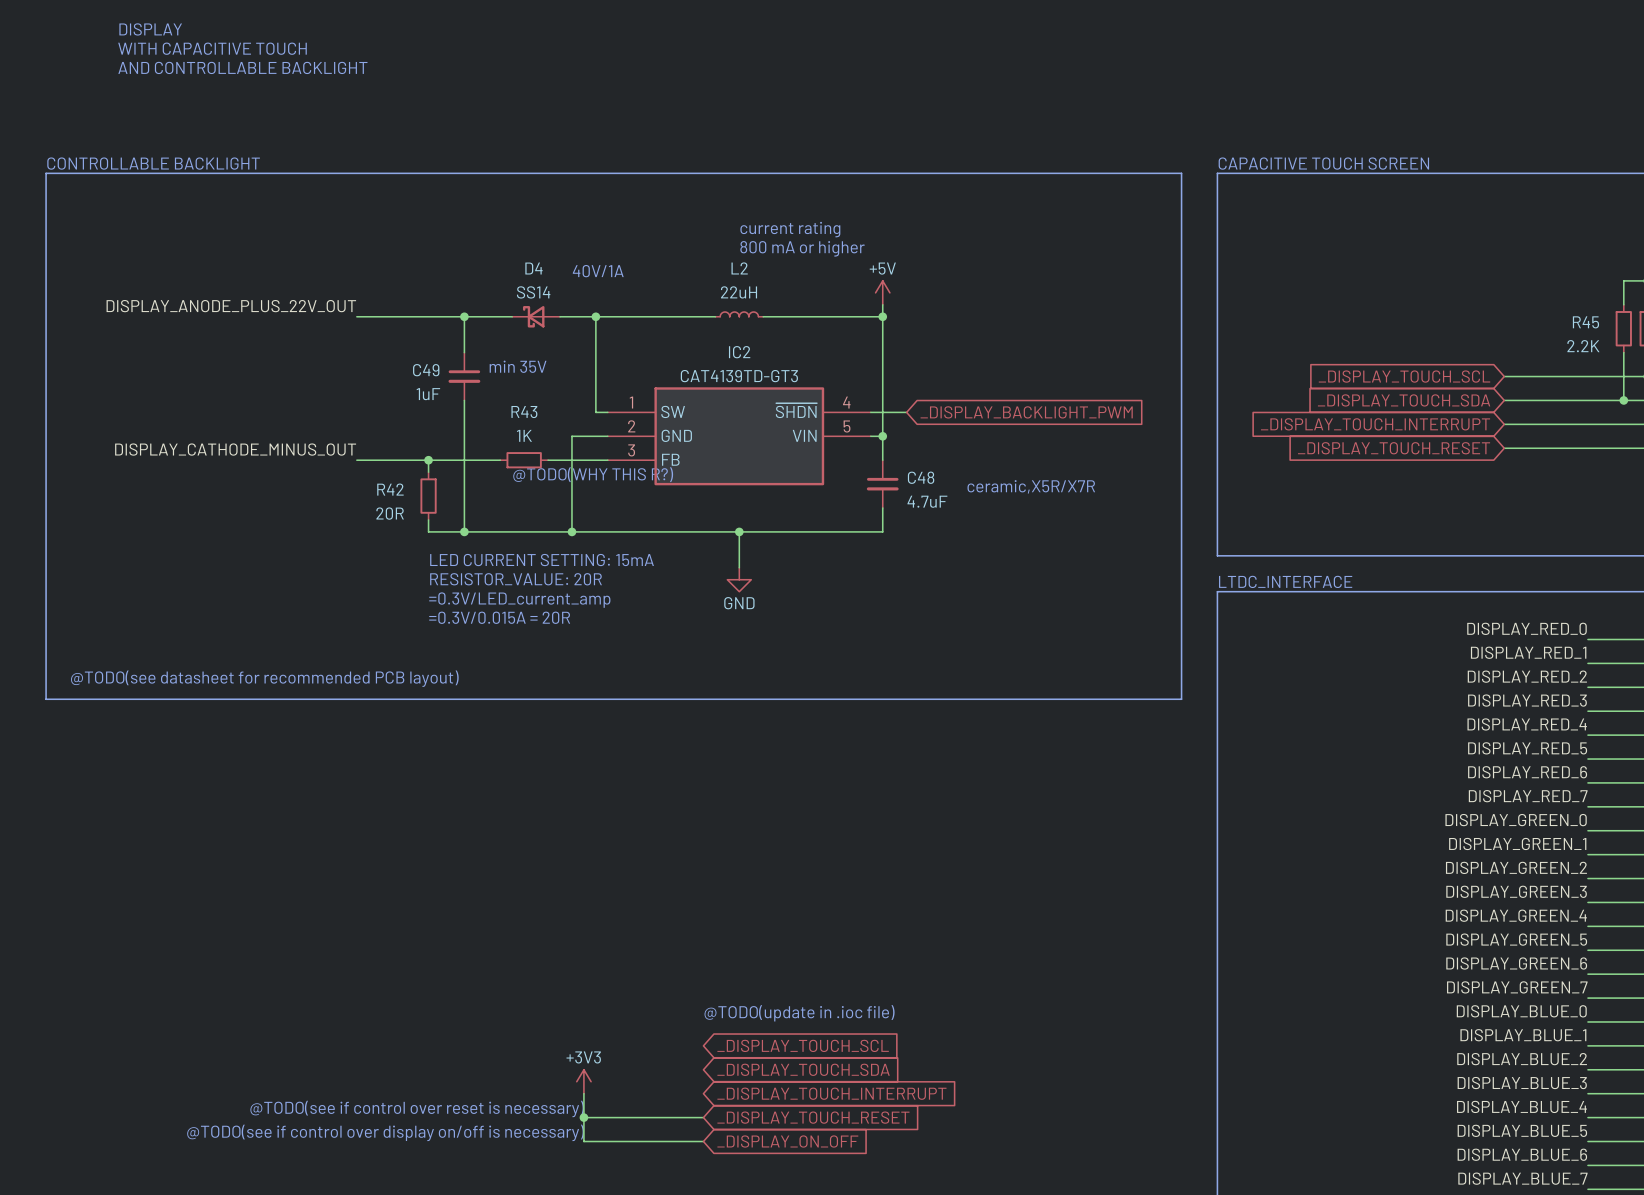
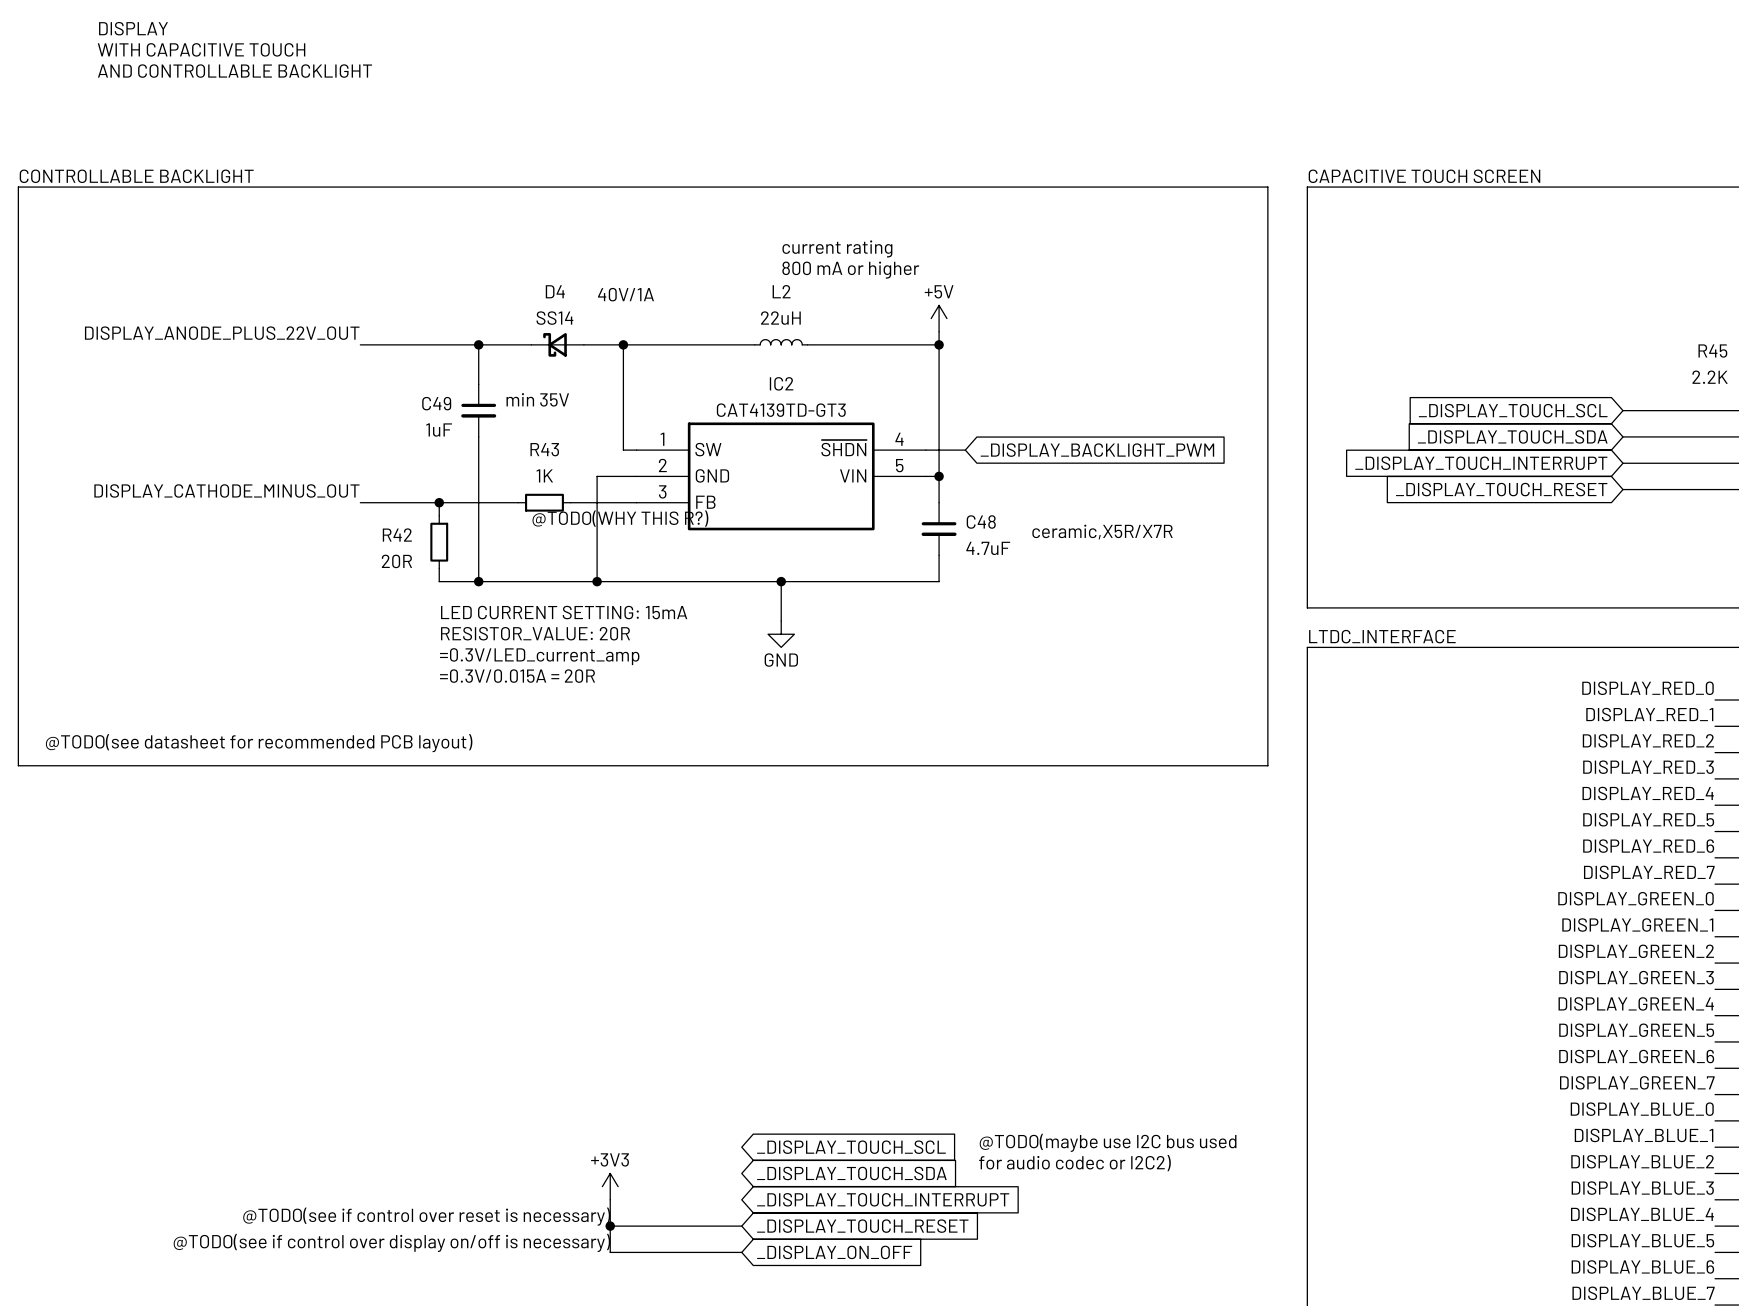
text: @TODO(update in .ioc file) (799, 1013) -> none
text: none -> @TODO(maybe use I2C bus used (1108, 1142)
text: none -> for audio codec or I2C2) (1074, 1163)

